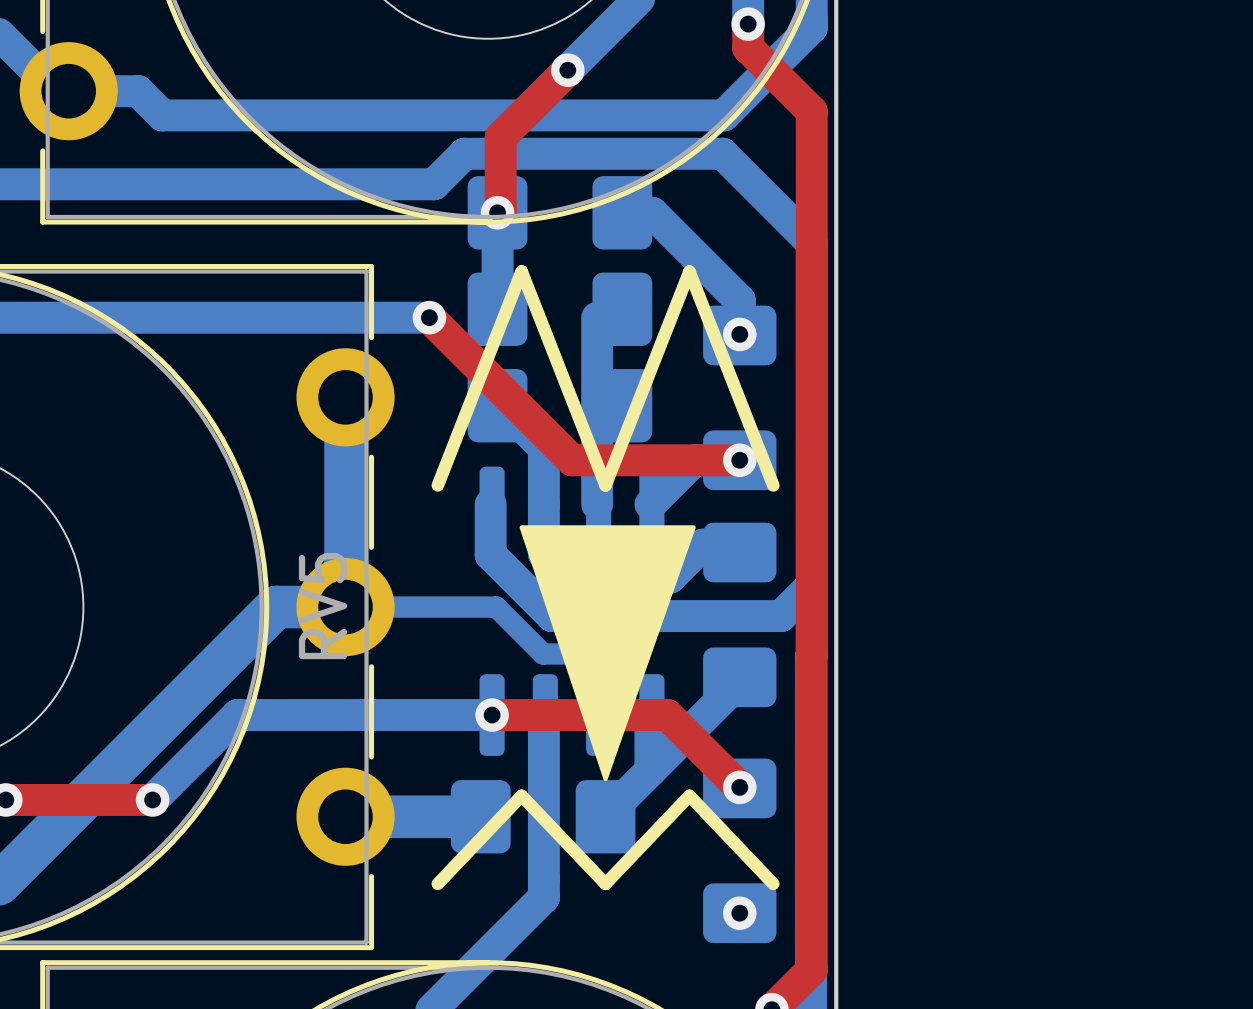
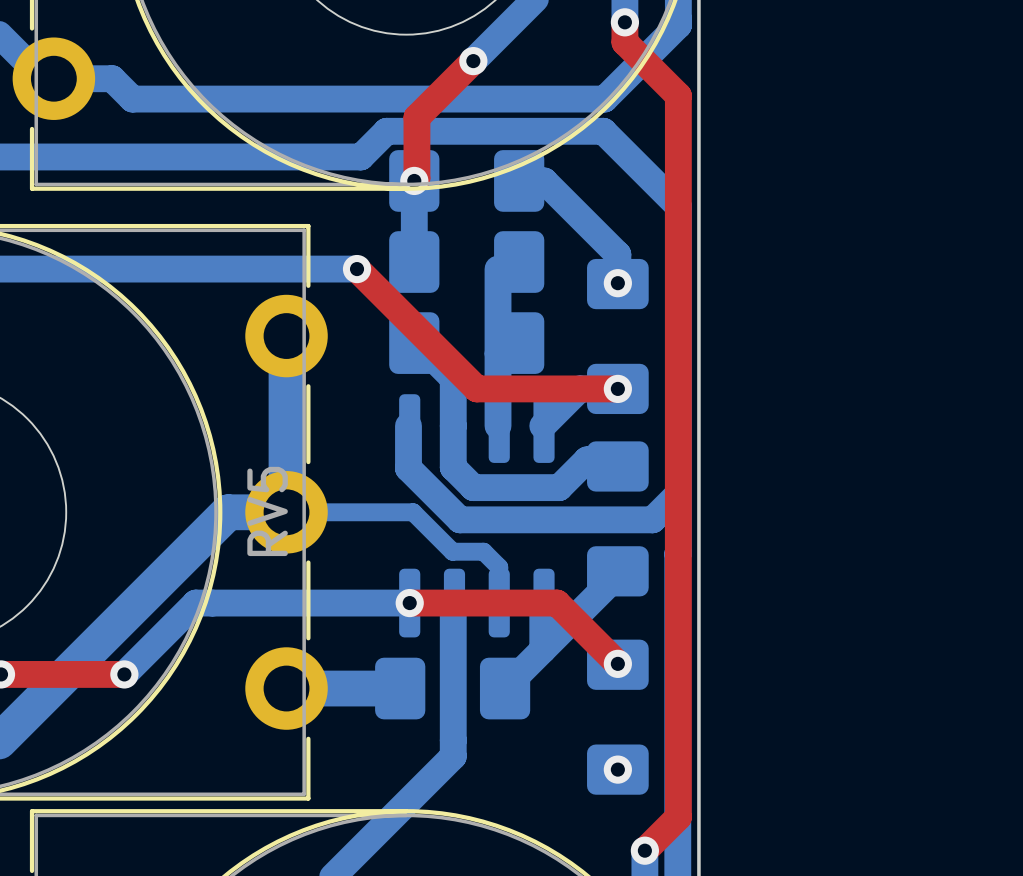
line: (437, 485) (521, 271) (605, 485) (689, 271) (773, 485) -> none
drawing: [519, 525, 696, 782] -> none
line: (437, 883) (521, 795) (605, 883) (689, 795) (773, 883) -> none

